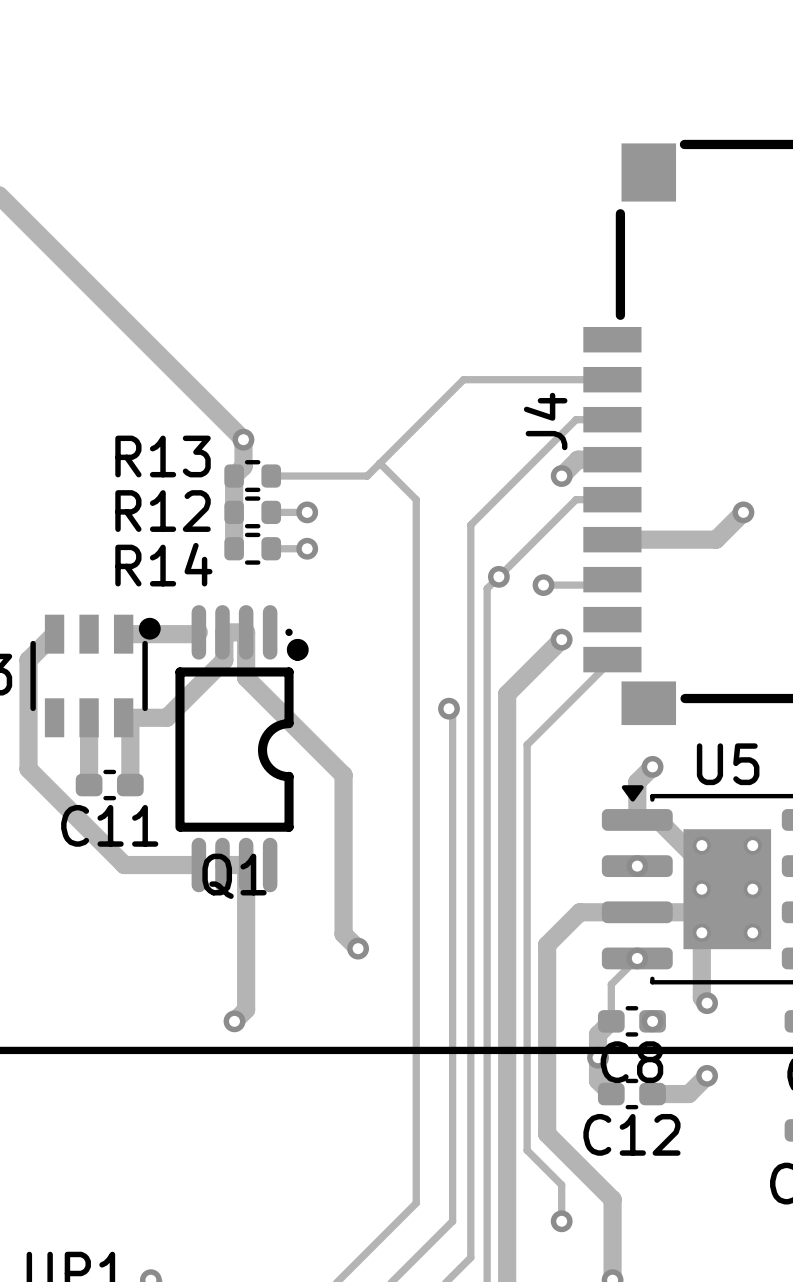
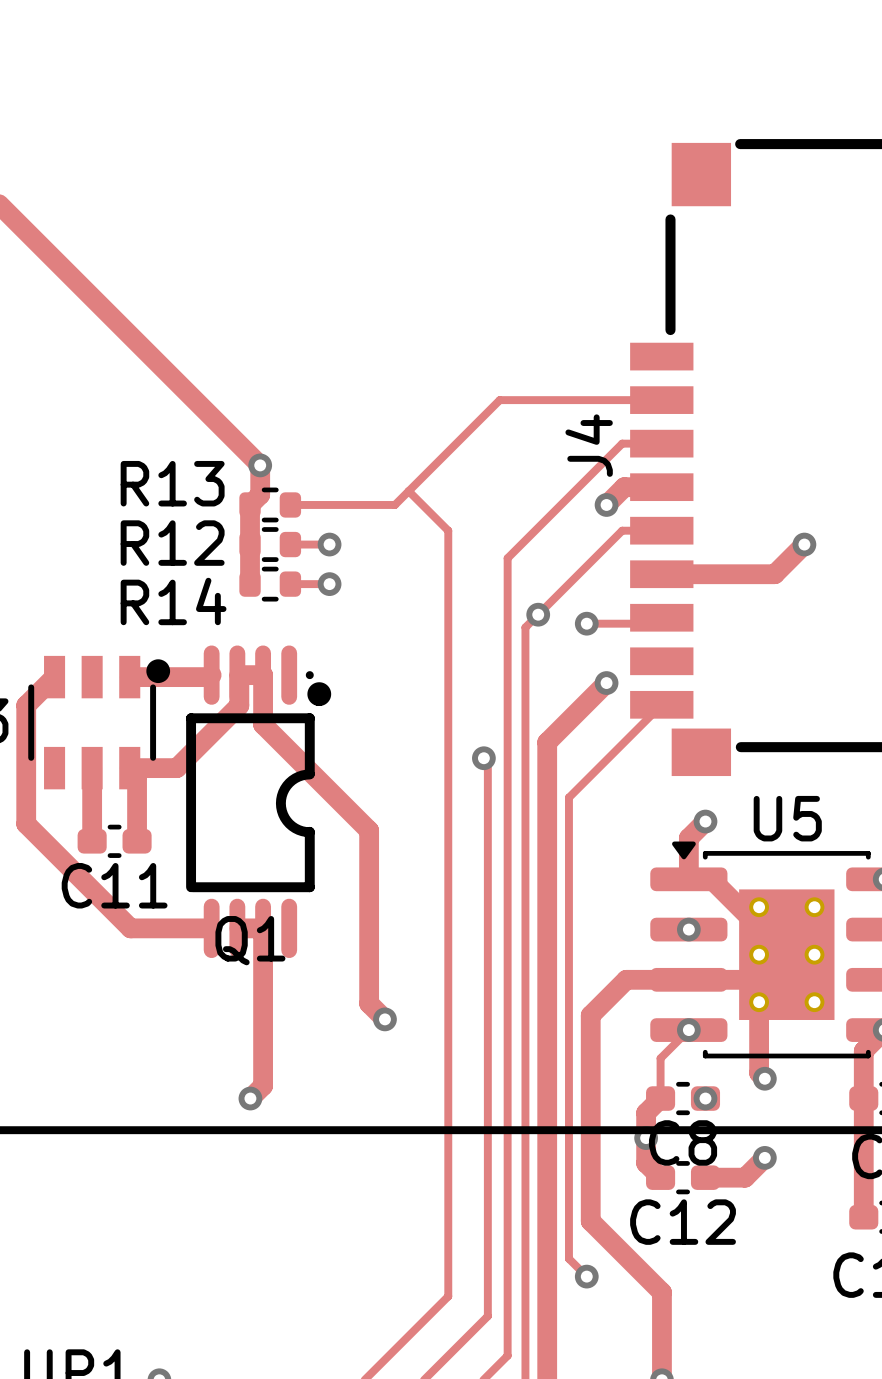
track: (527, 1150) (561, 1184) (561, 1221) -> (568, 1239) (568, 1258) (586, 1276)
via position: (561, 1221) -> (586, 1276)

